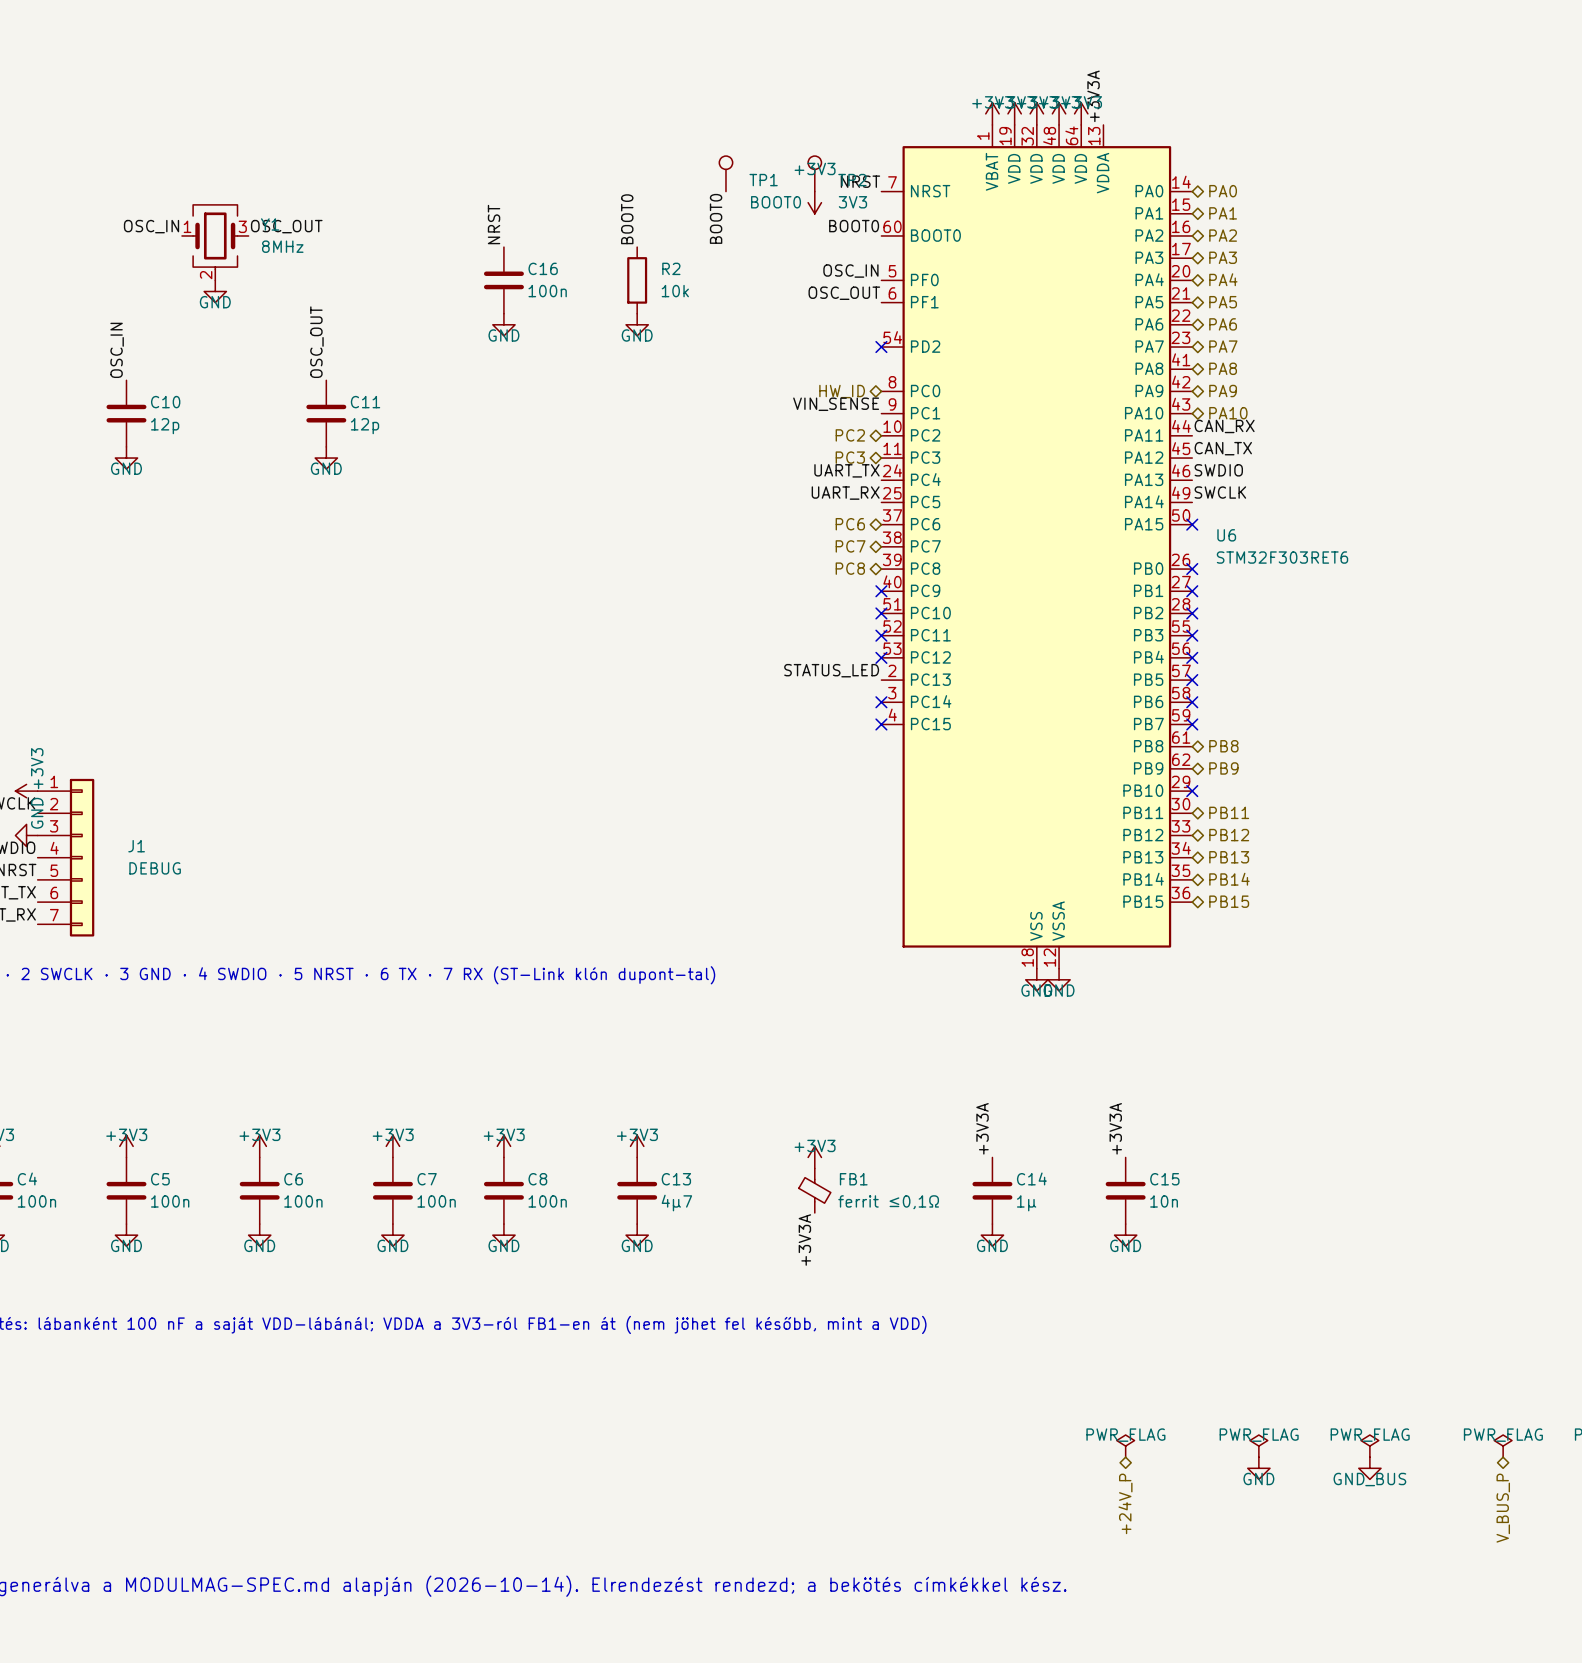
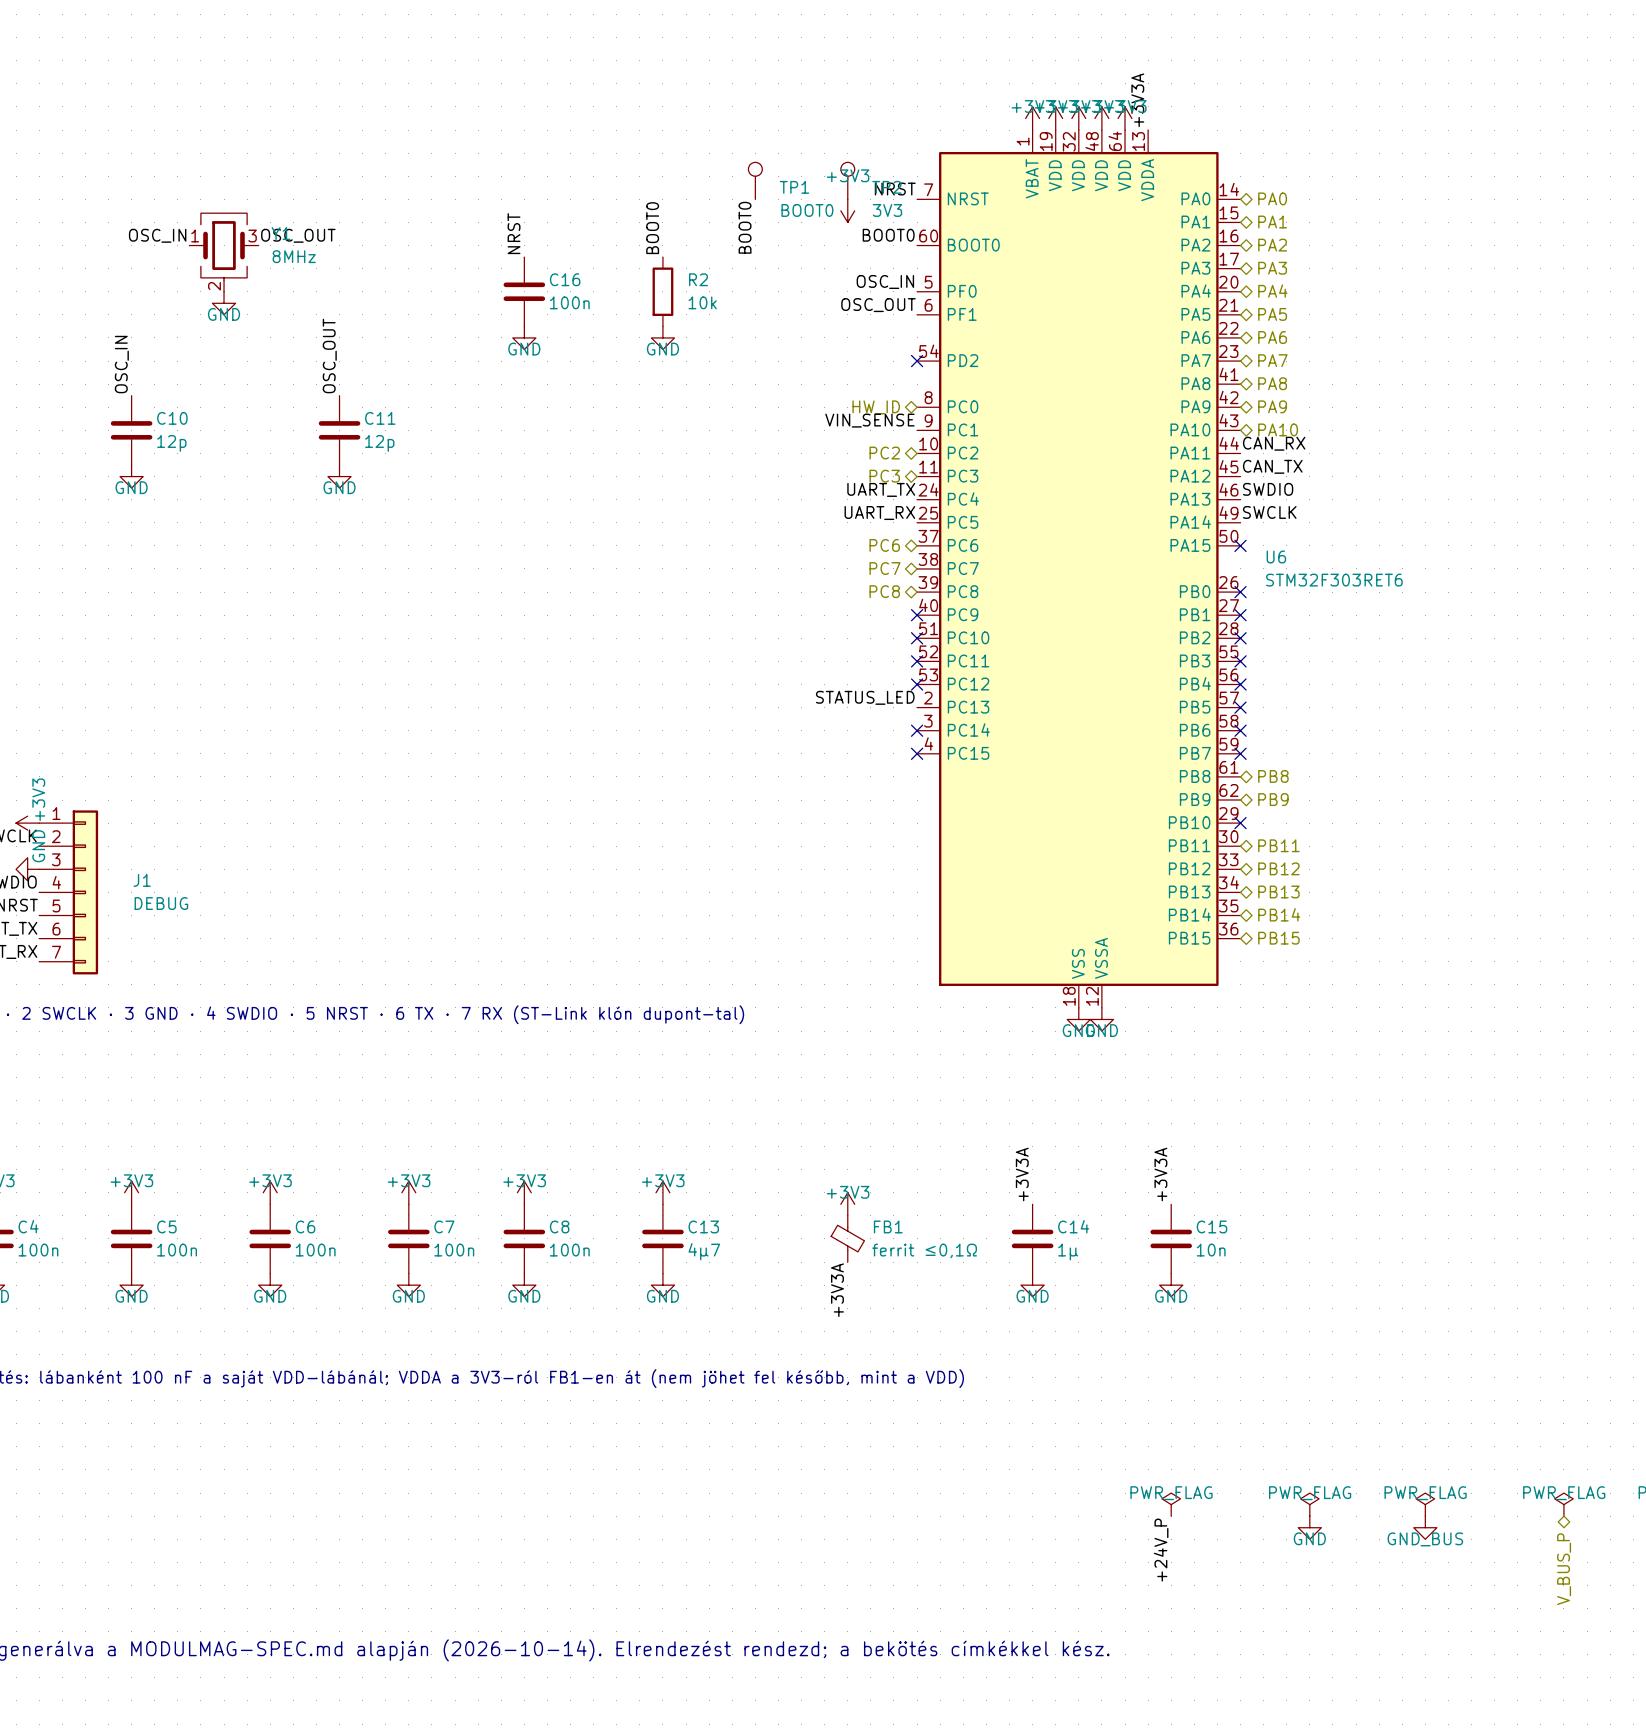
label: none -> +24V_P (1161, 1550)
hierarchical label: +24V_P (1125, 1503) -> none

